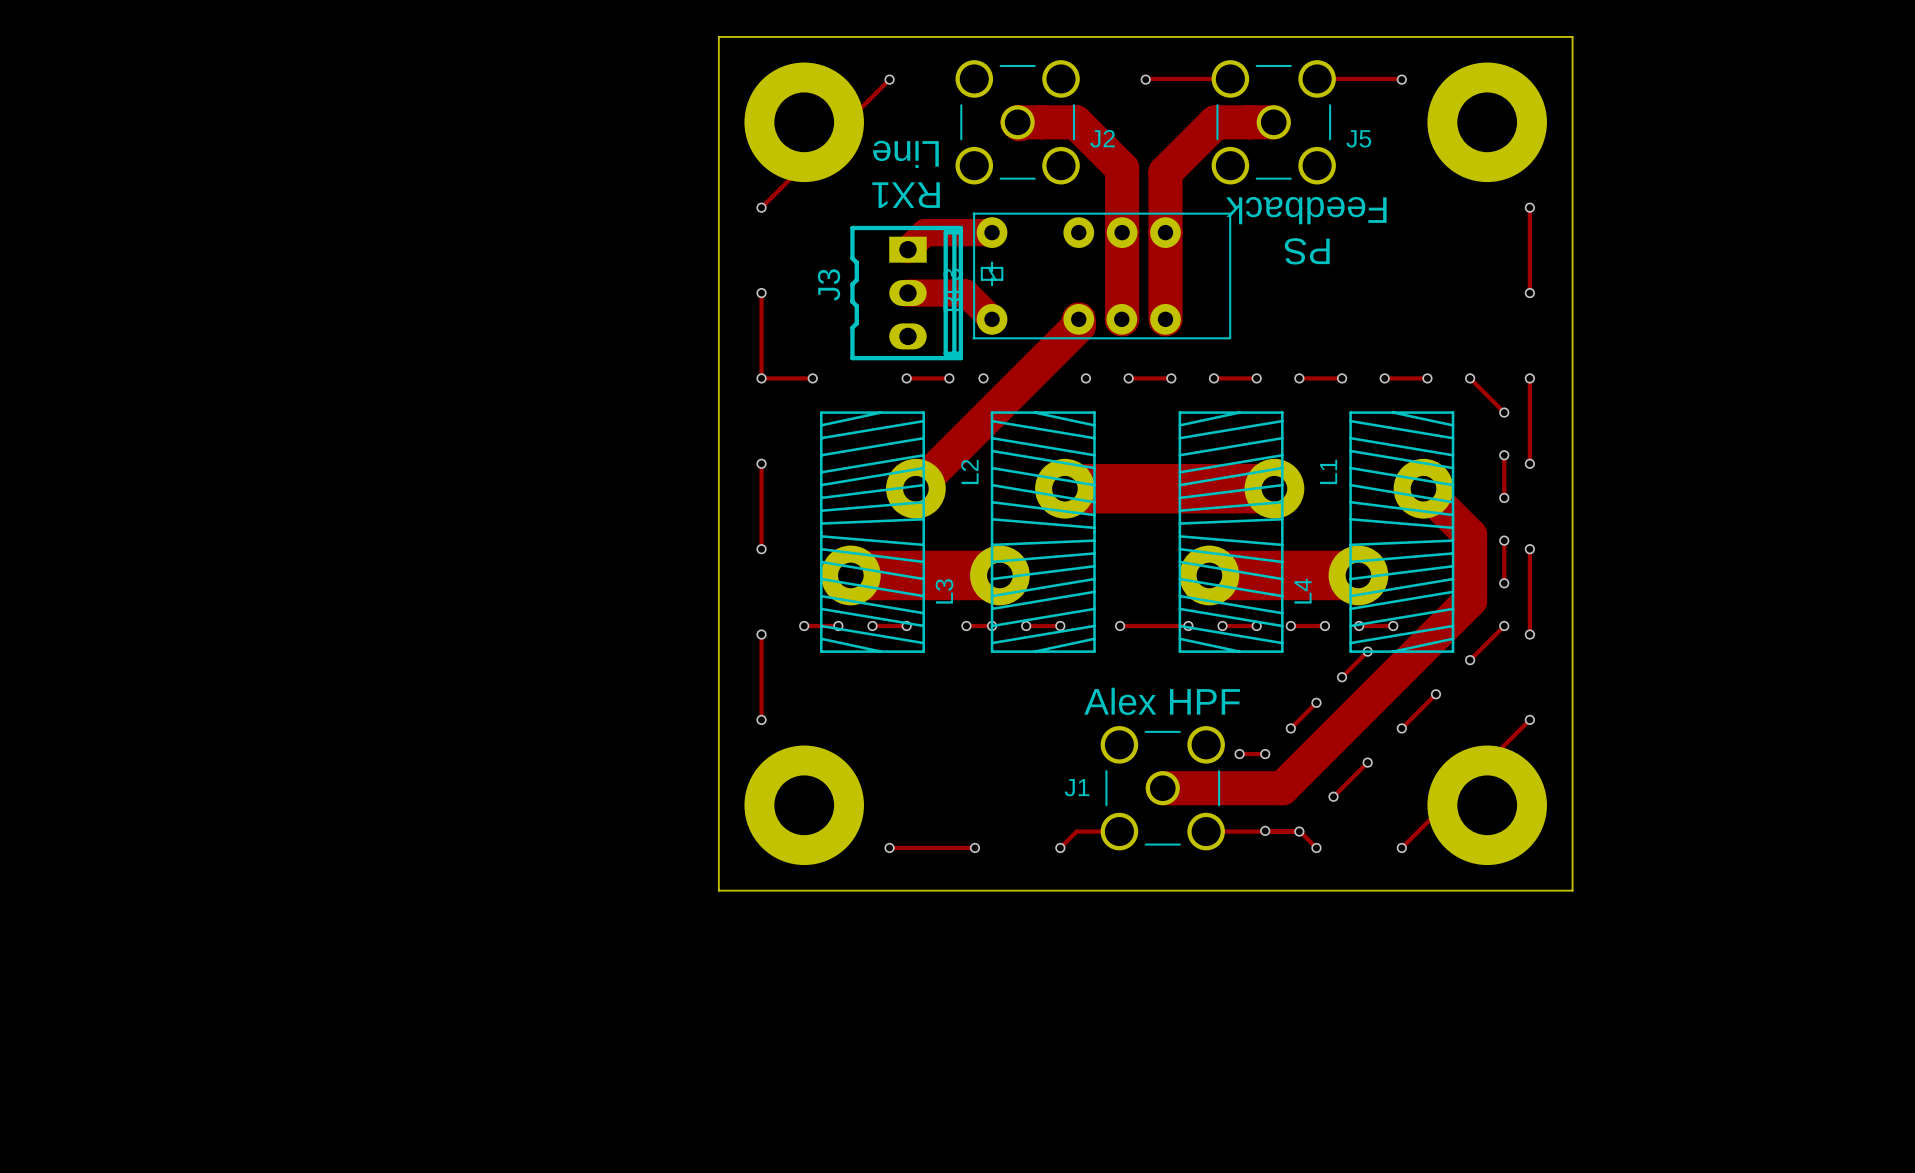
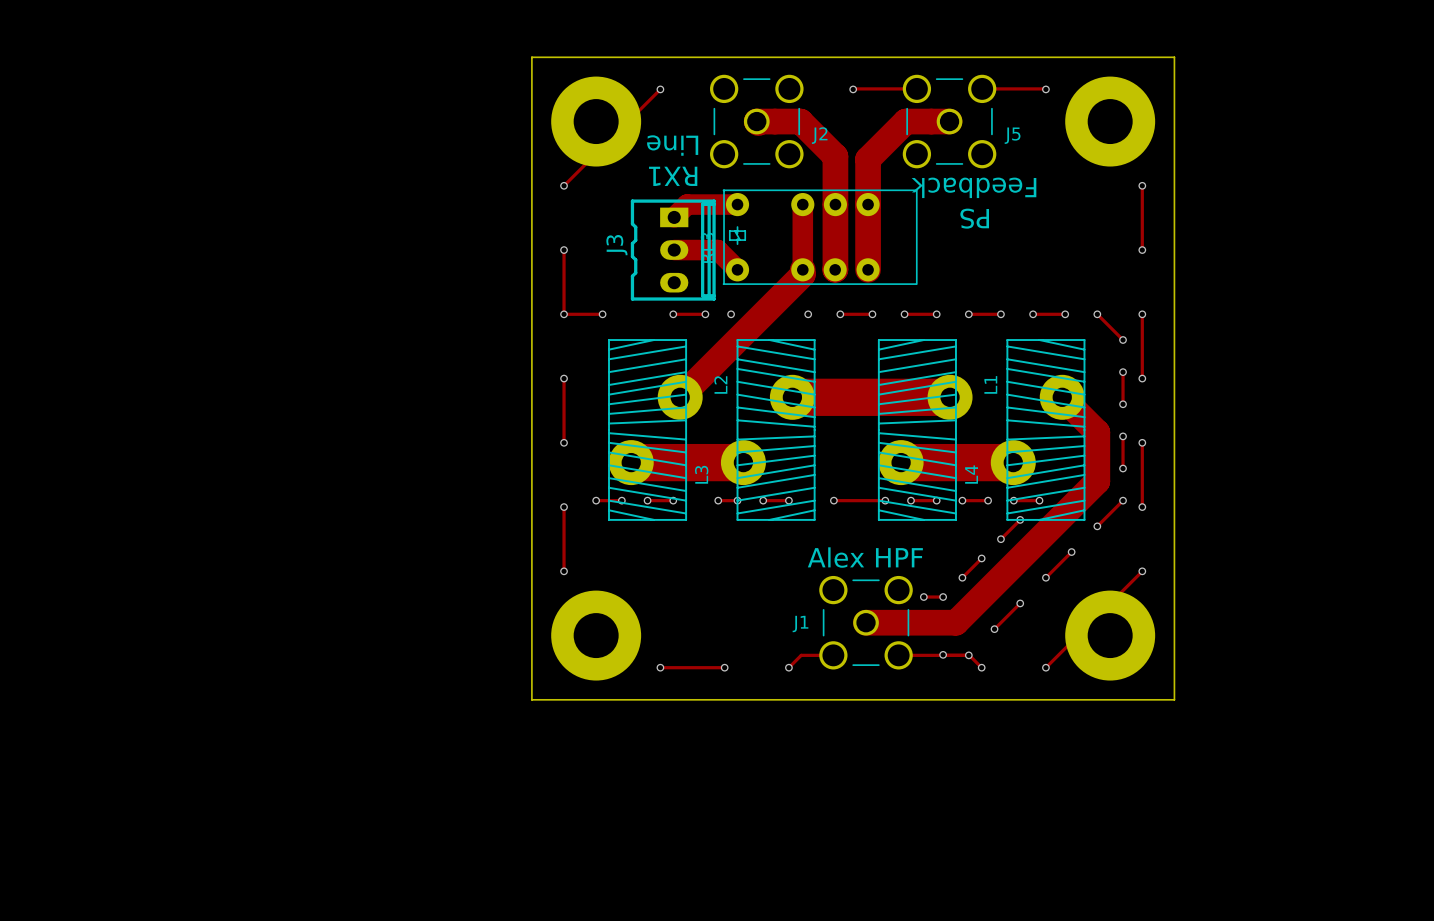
track: none -> (802, 204) (802, 269)

